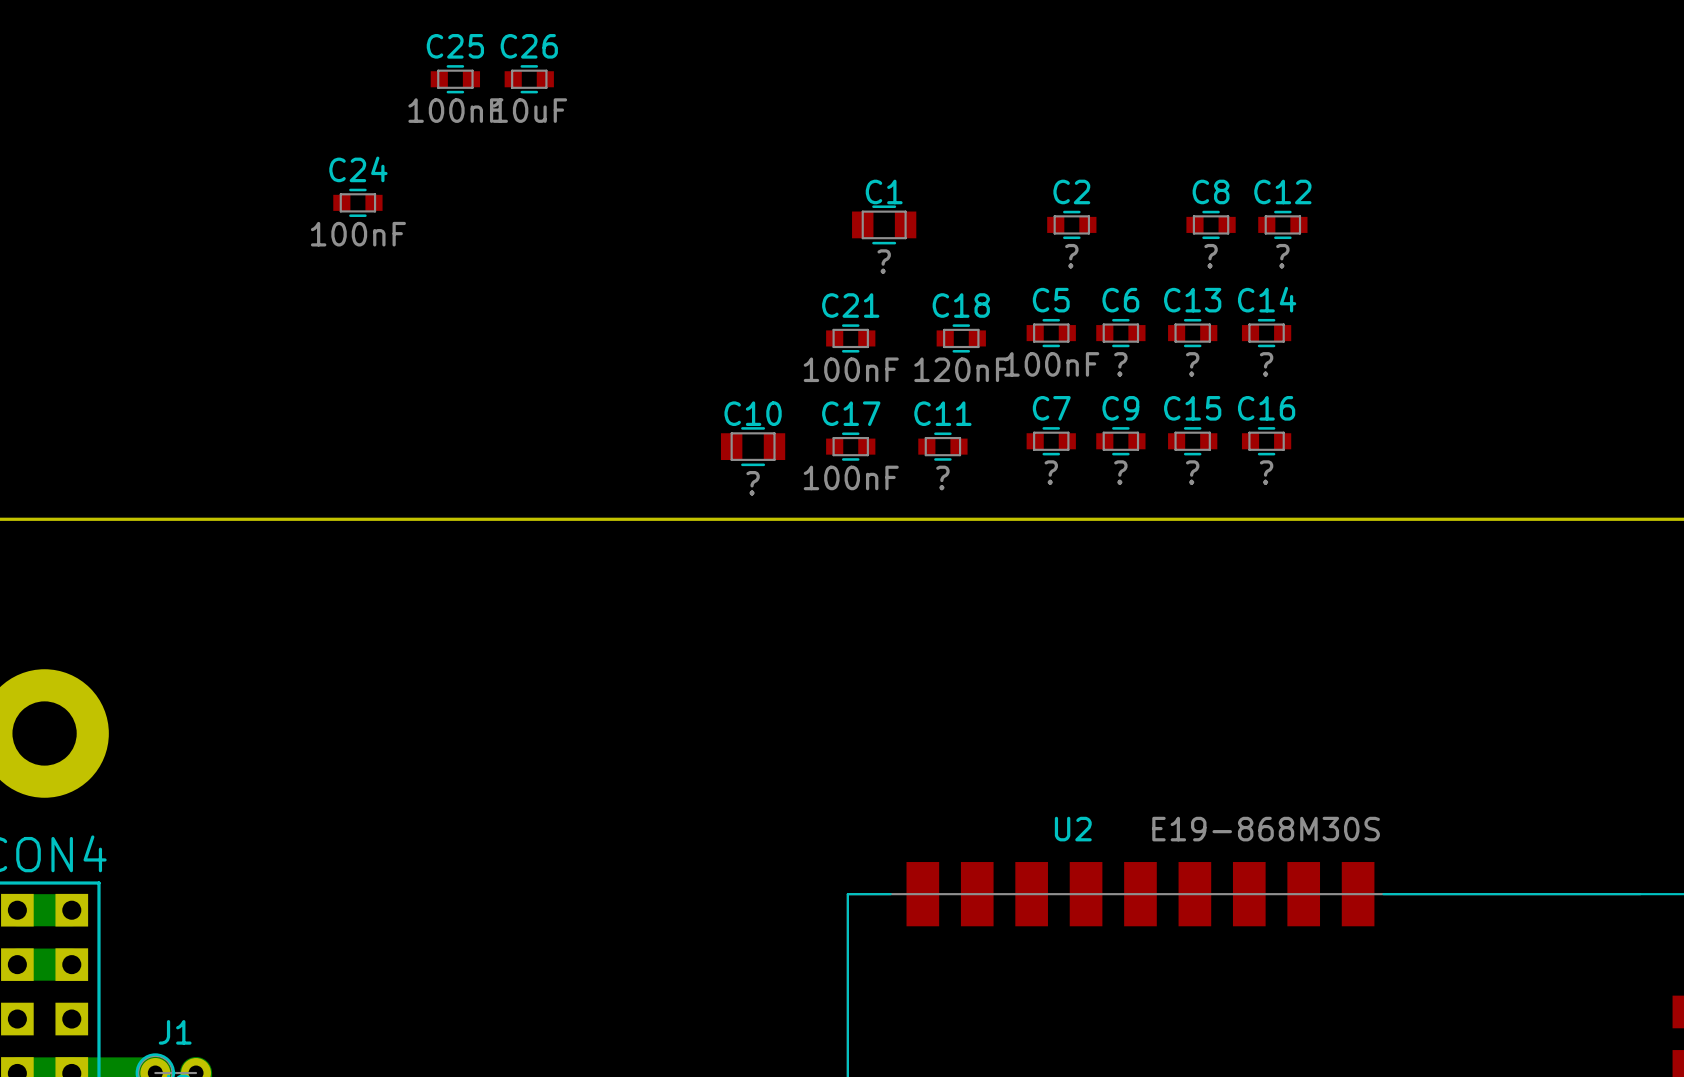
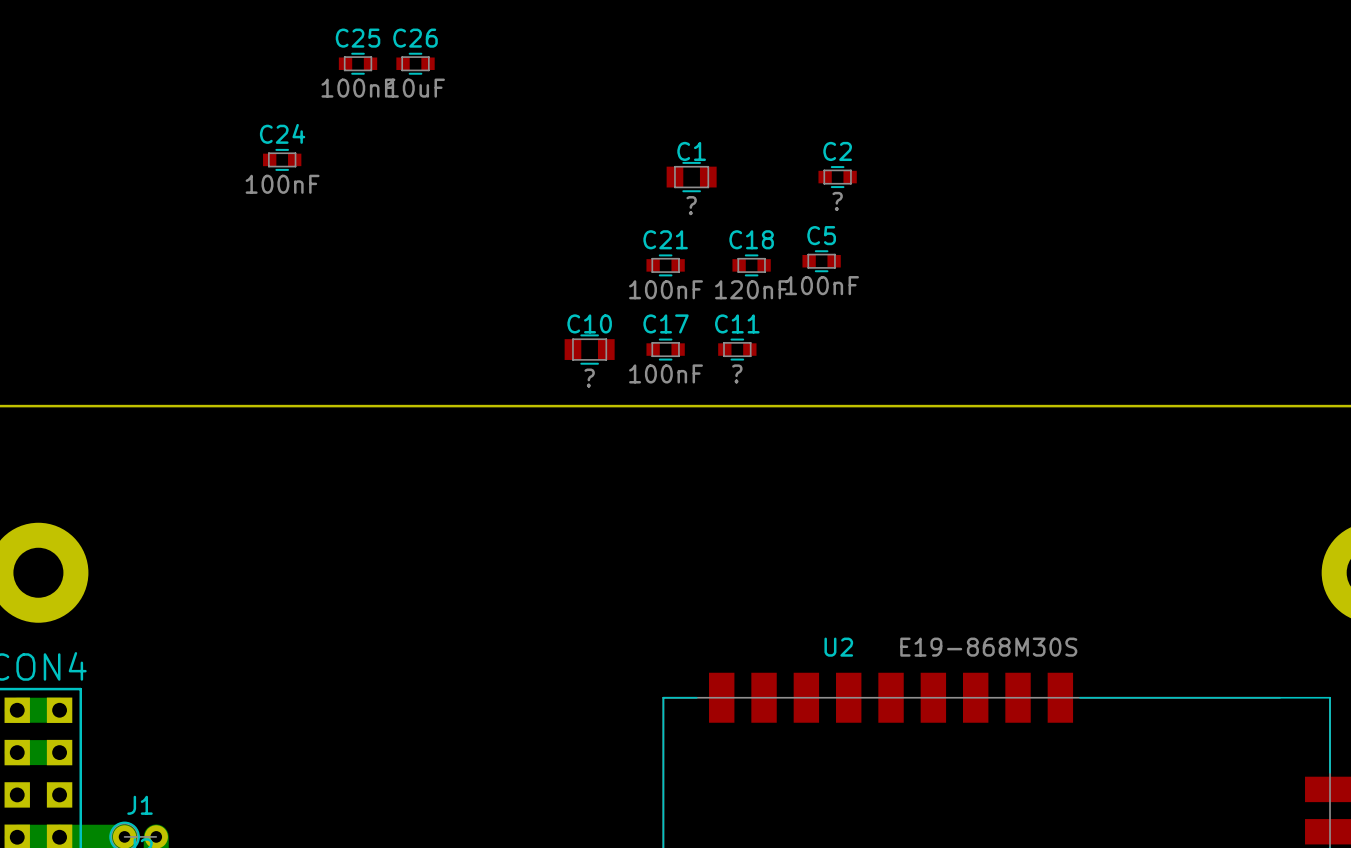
C8: ? (1211, 224) -> none
C12: ? (1282, 224) -> none
C6: ? (1120, 333) -> none
C13: ? (1192, 333) -> none
C14: ? (1266, 333) -> none
C7: ? (1051, 441) -> none
C9: ? (1120, 441) -> none
C15: ? (1192, 441) -> none
C16: ? (1266, 441) -> none

